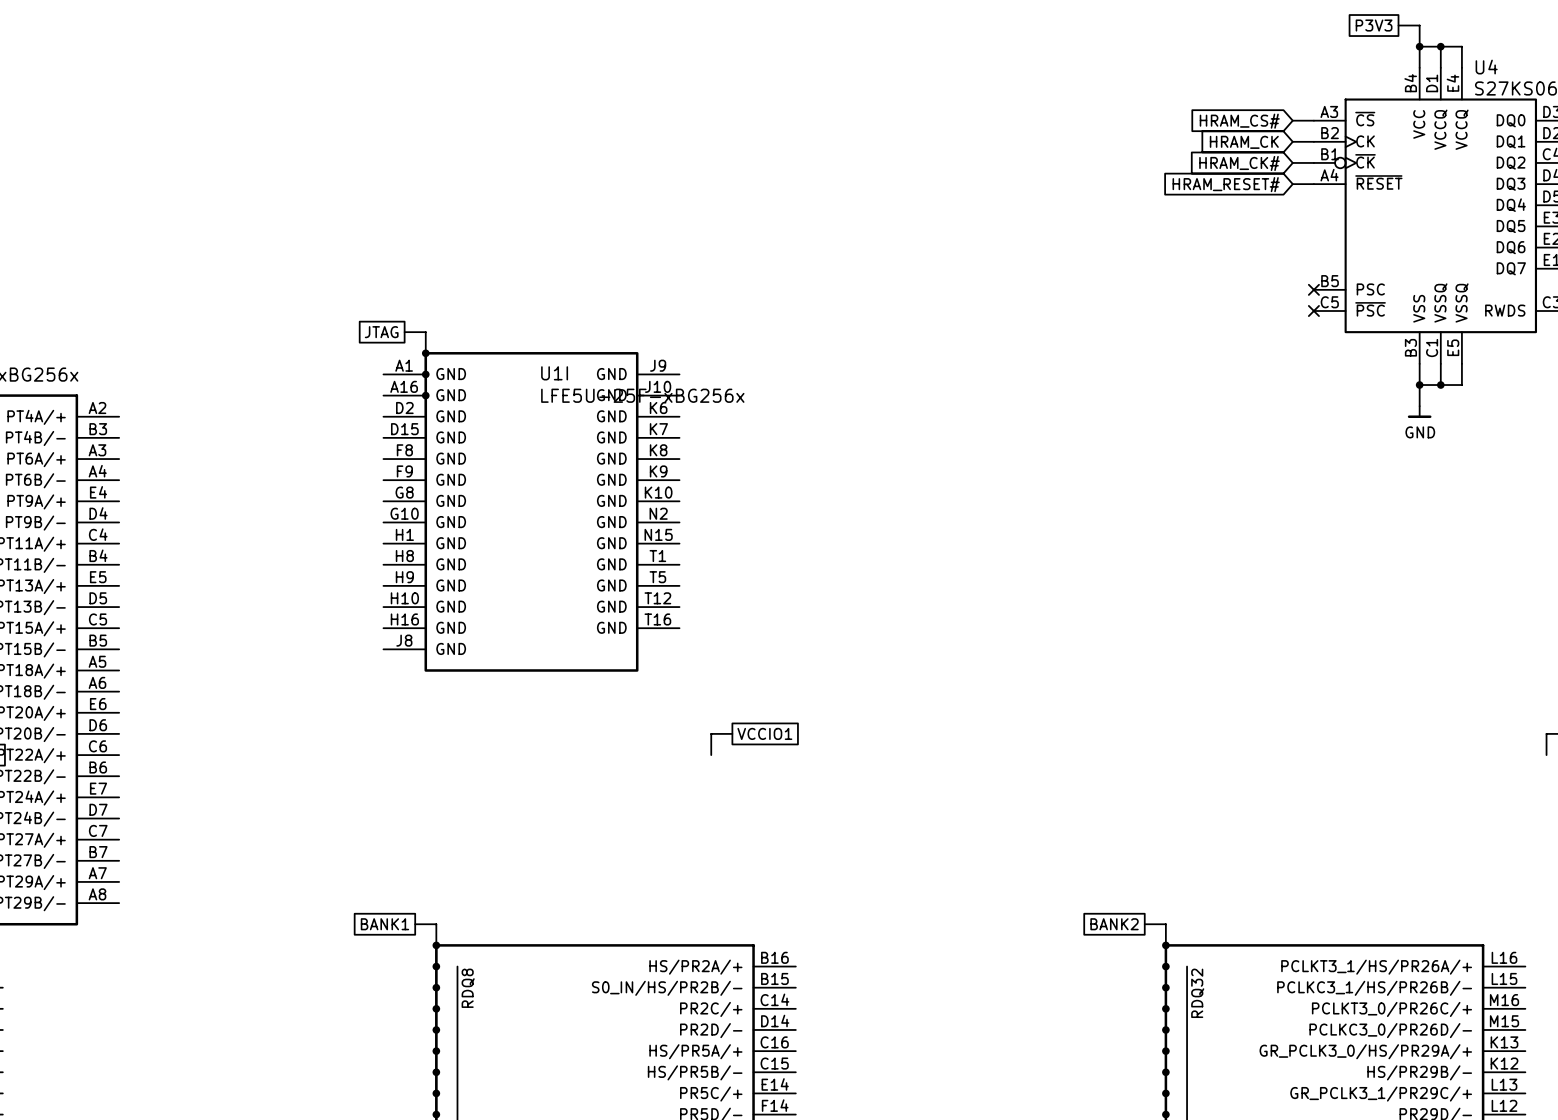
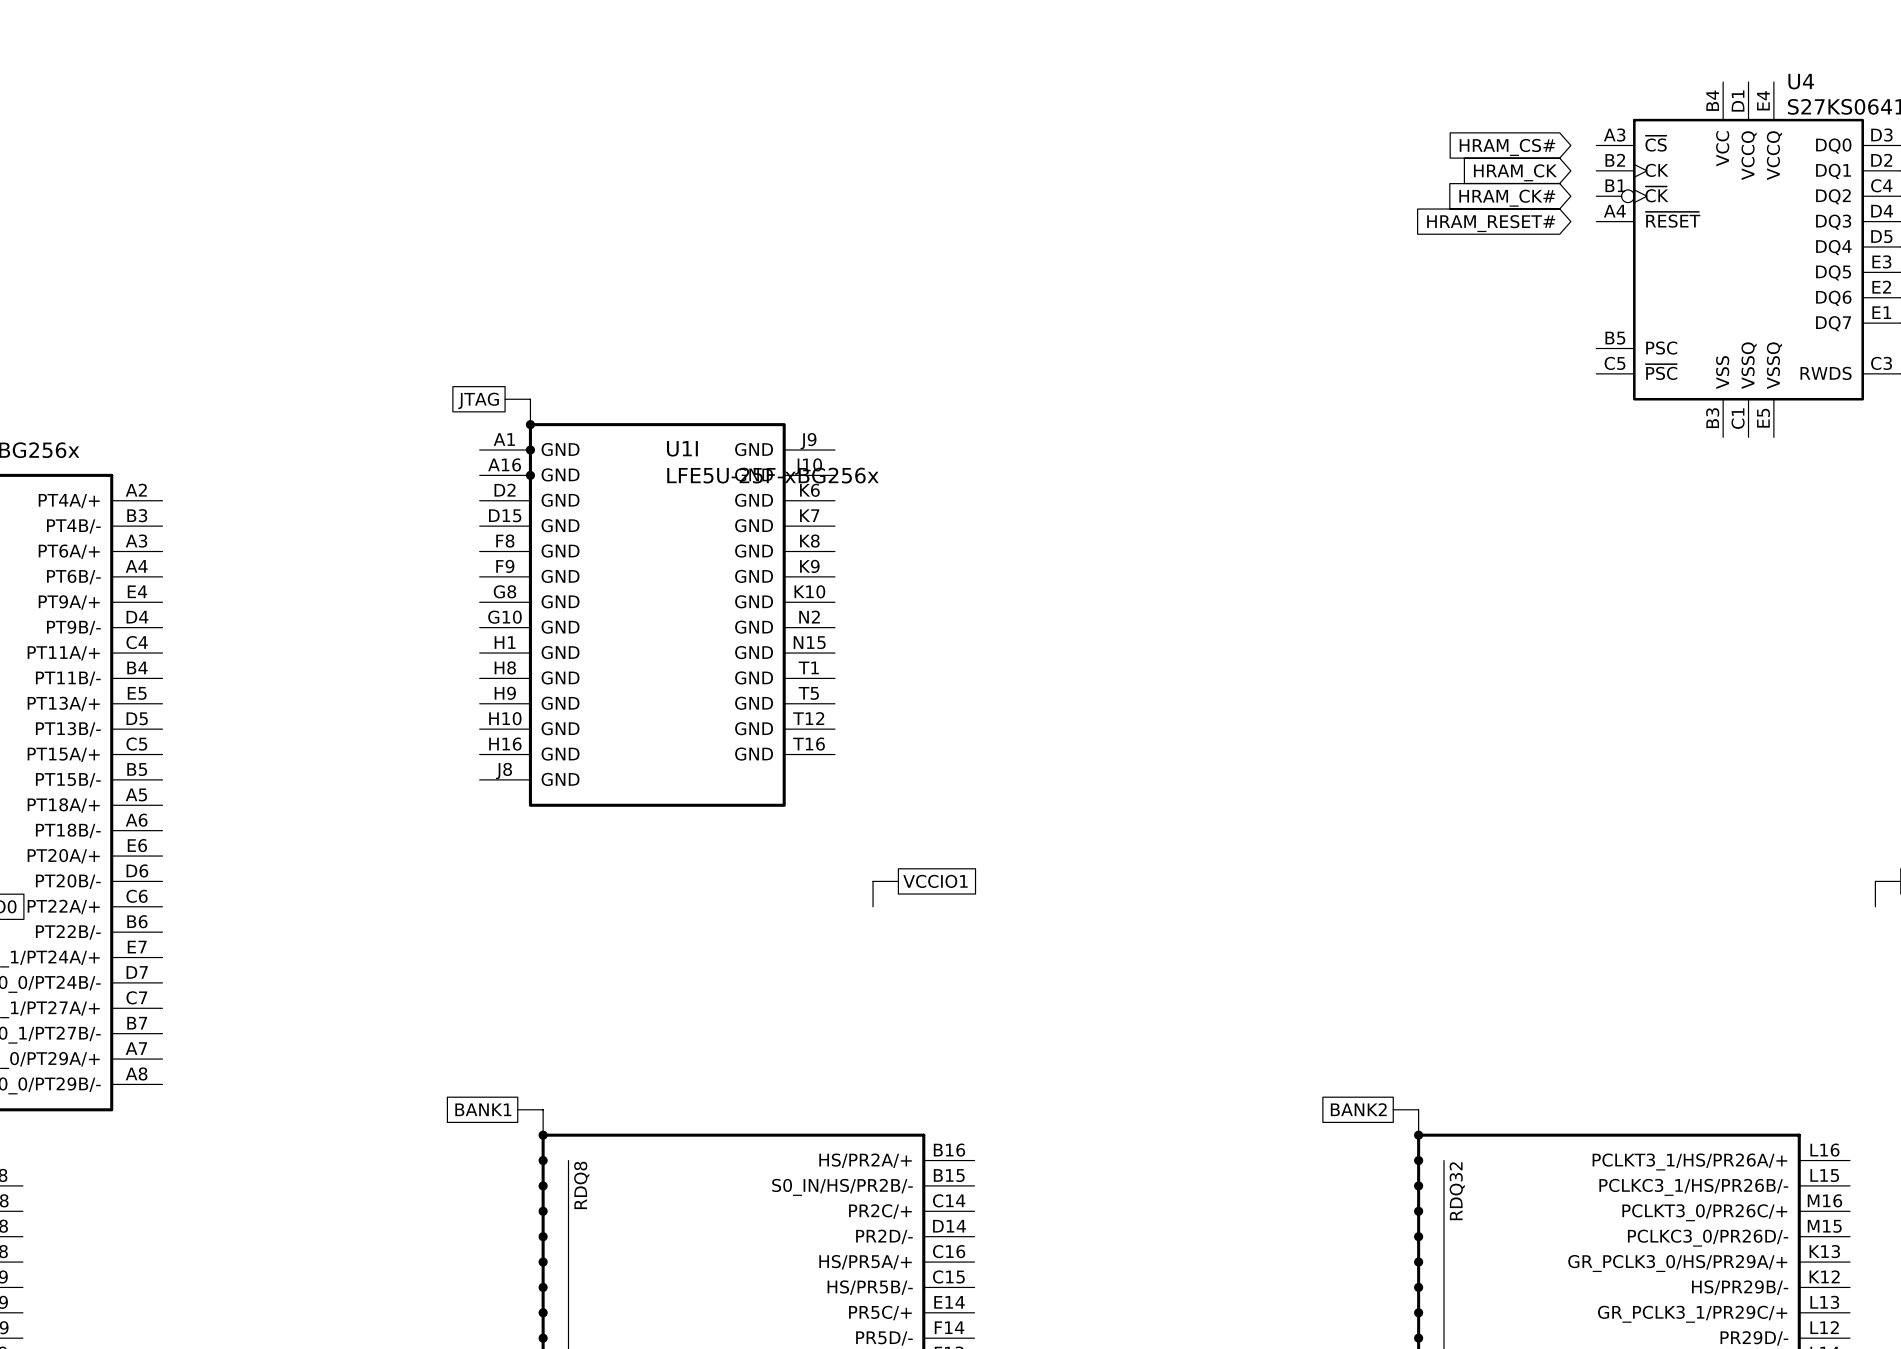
global label: P3V3 (1374, 25) -> none
wire: (1398, 25) (1419, 25) (1419, 67) -> none
wire: (1419, 46) (1461, 46) (1461, 67) -> none
junction: (1419, 46) -> none
wire: (1440, 46) (1440, 67) -> none
junction: (1440, 46) -> none
wire: (1292, 120) (1313, 120) -> none
wire: (1292, 141) (1313, 141) -> none
wire: (1292, 162) (1313, 162) -> none
wire: (1292, 184) (1313, 184) -> none
no-connect mark: (1313, 289) -> none
no-connect mark: (1313, 311) -> none
wire: (1419, 363) (1419, 406) -> none
wire: (1440, 363) (1440, 385) -> none
wire: (1461, 363) (1461, 385) (1419, 385) -> none
junction: (1419, 385) -> none
junction: (1440, 385) -> none
power symbol: GND (1419, 412) -> none

